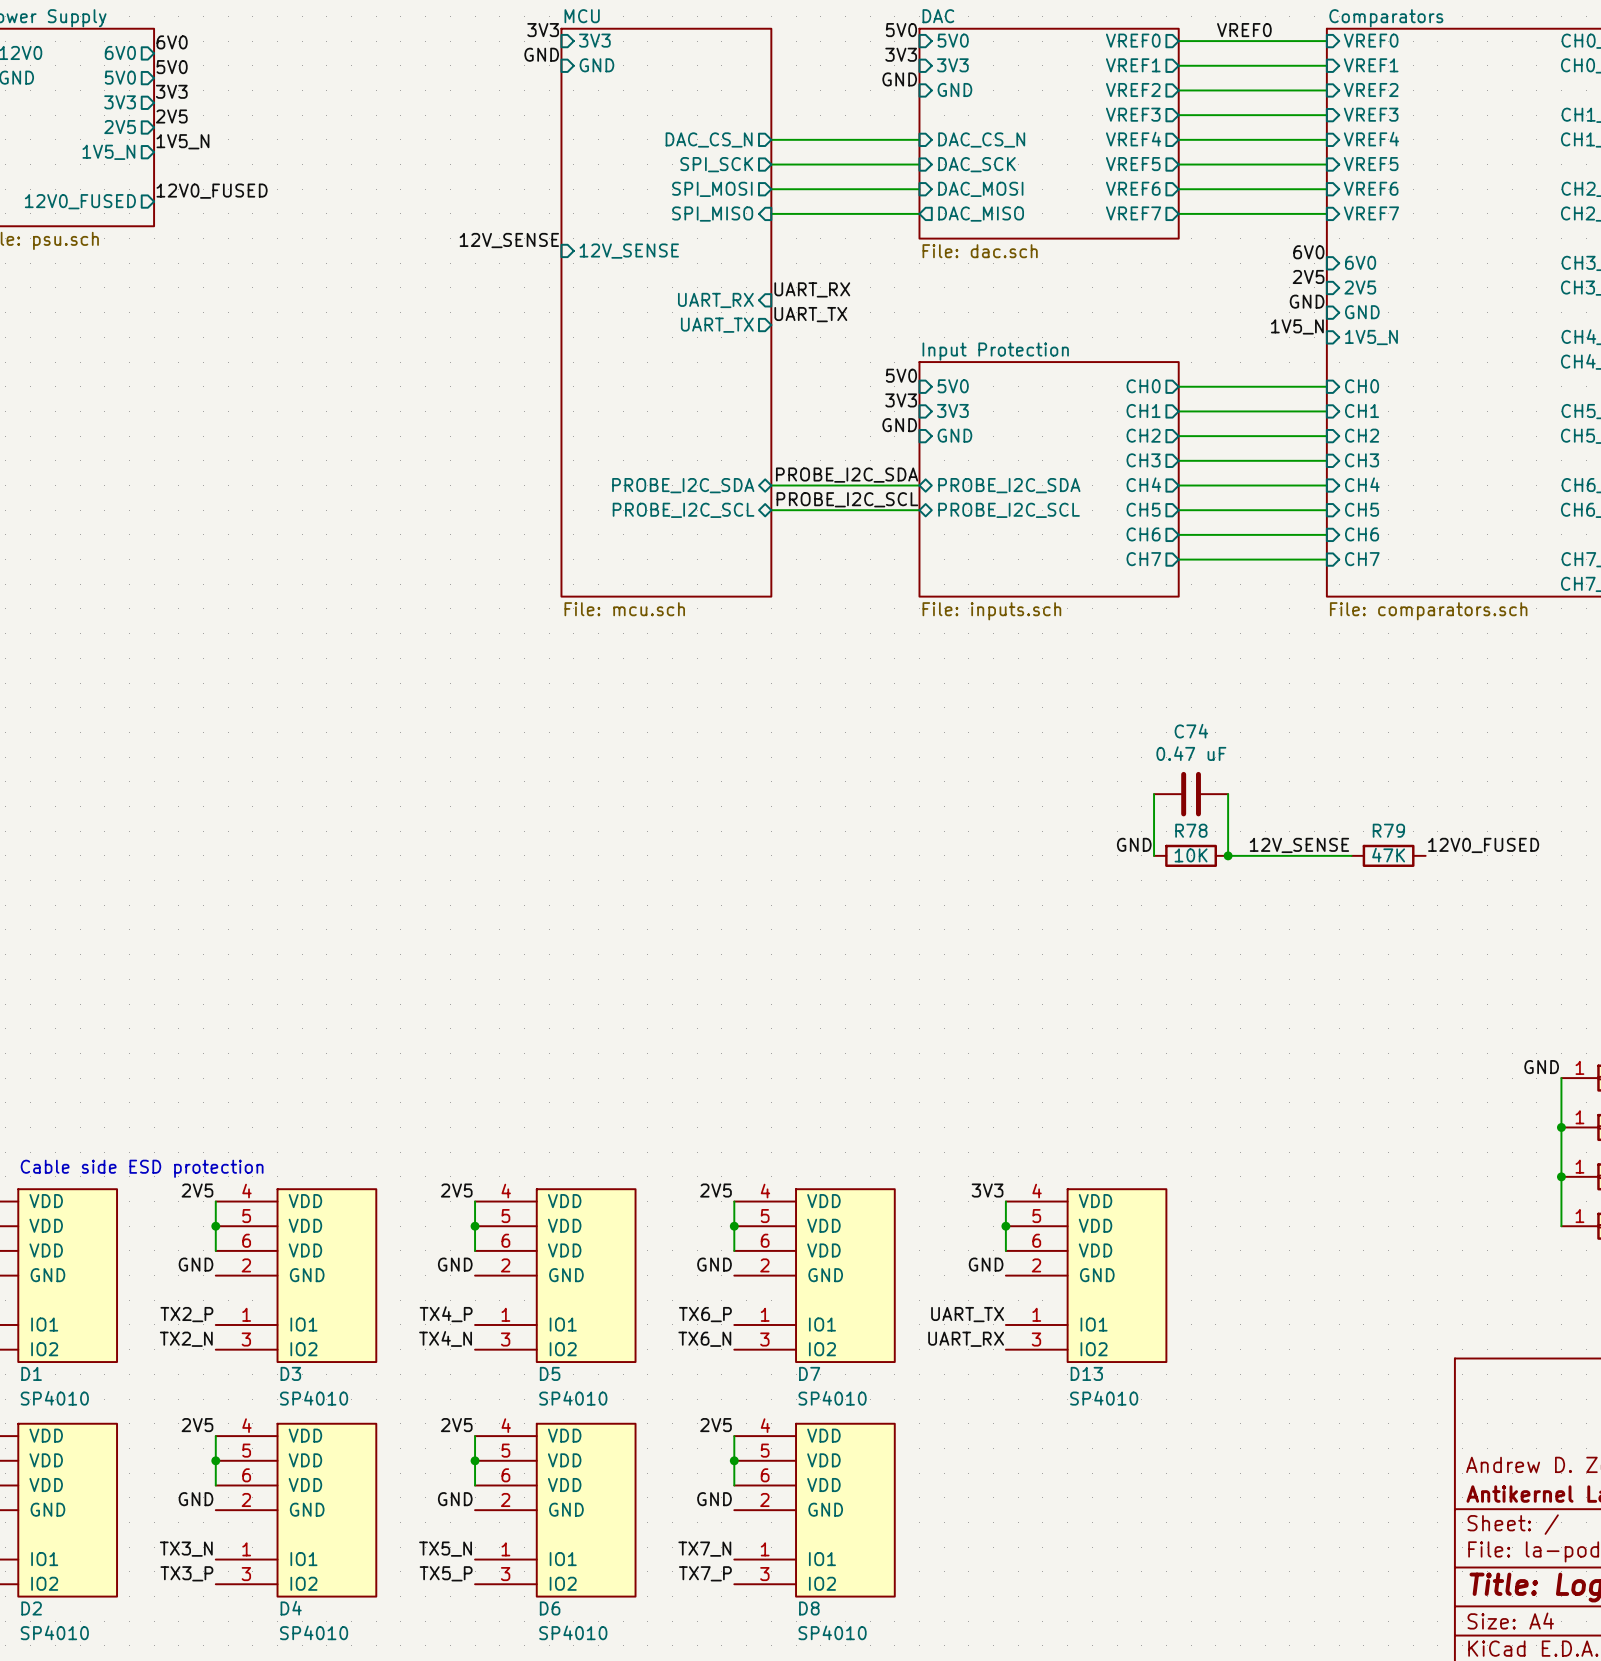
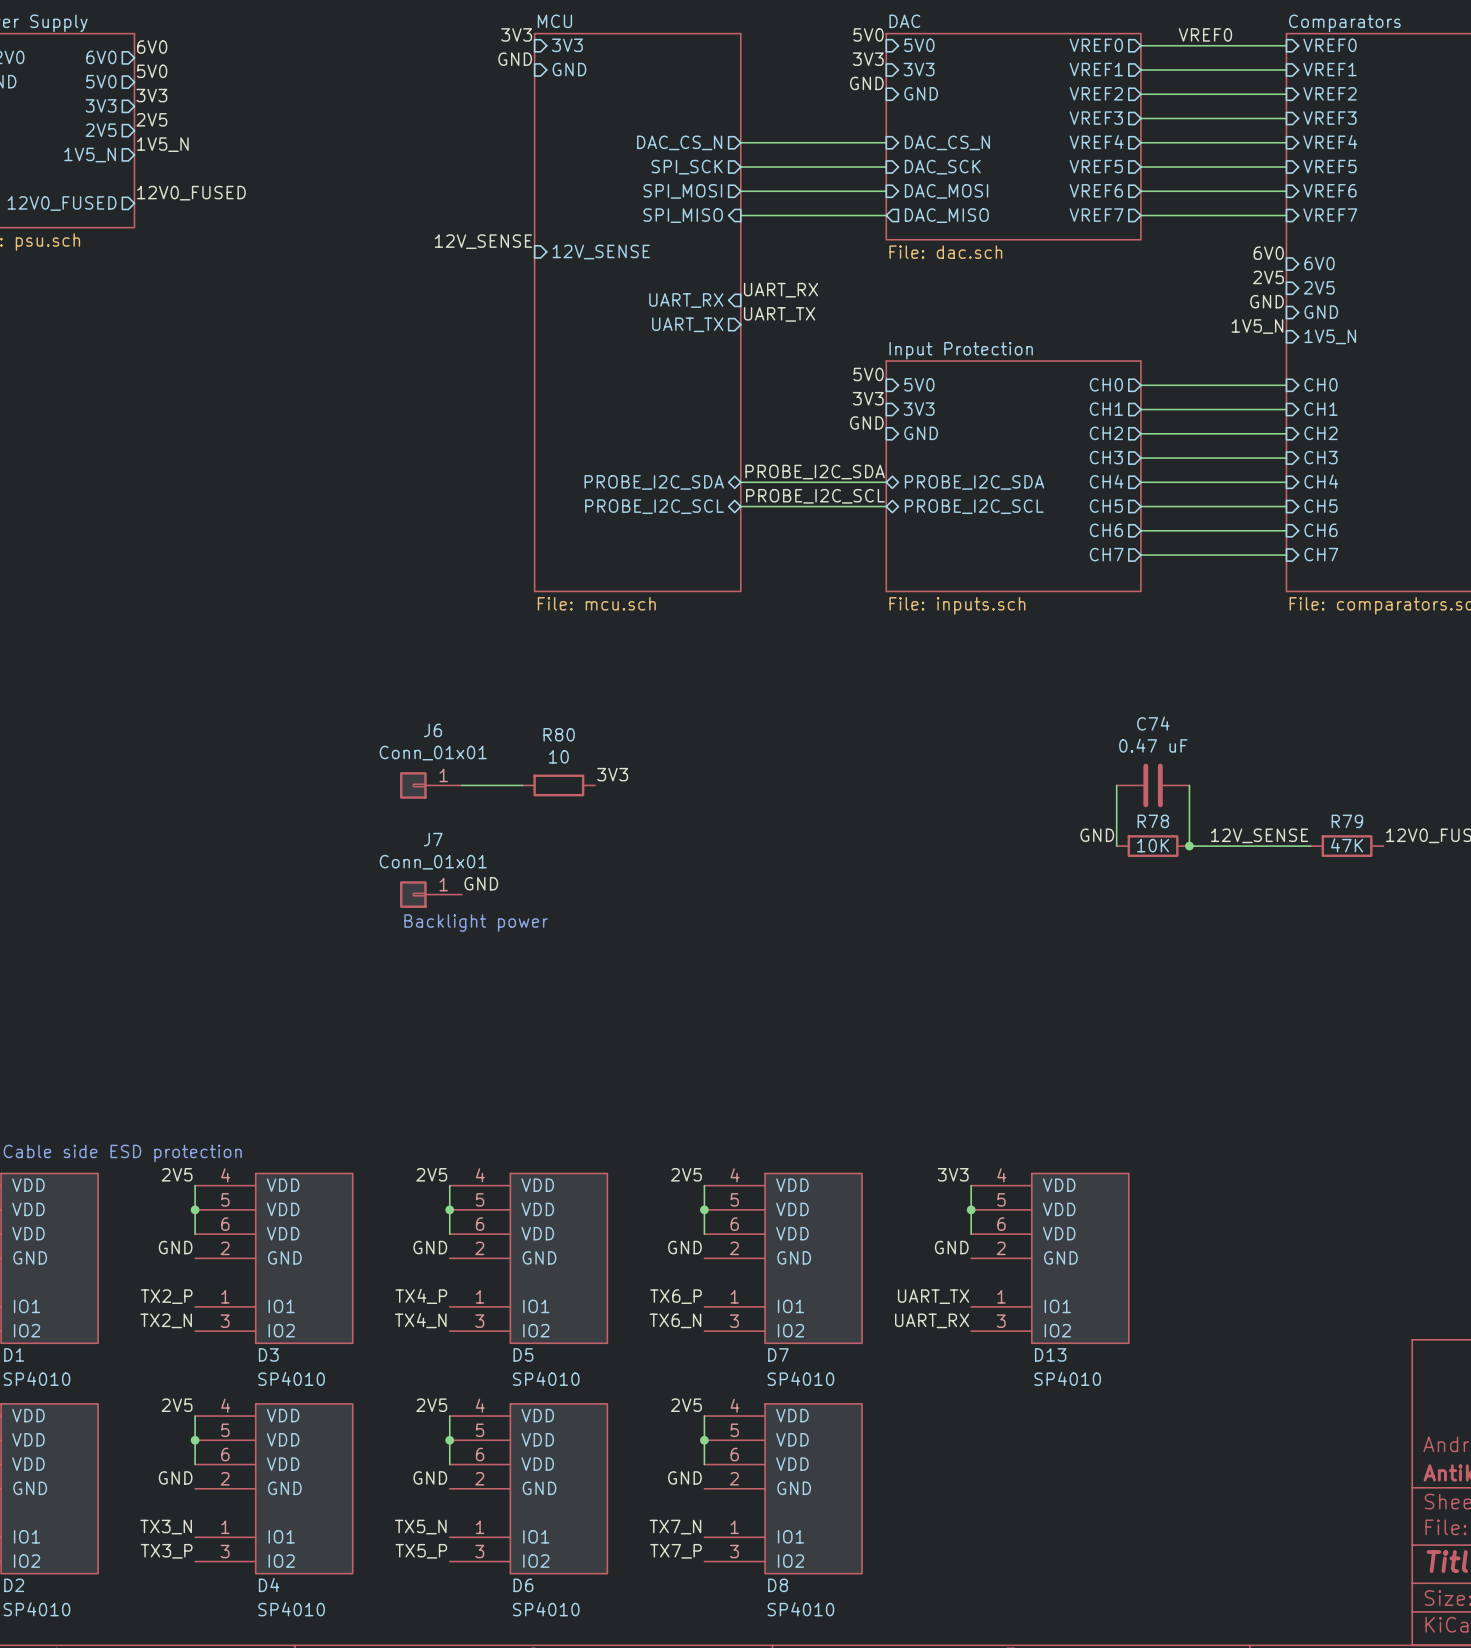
label: none -> 3V3 (612, 774)
J6: none -> Conn_01x01 (430, 785)
wire: none -> (461, 785) (522, 785)
R80: none -> 10 (558, 785)
label: none -> GND (481, 883)
J7: none -> Conn_01x01 (430, 894)
text: none -> Backlight power (476, 923)

